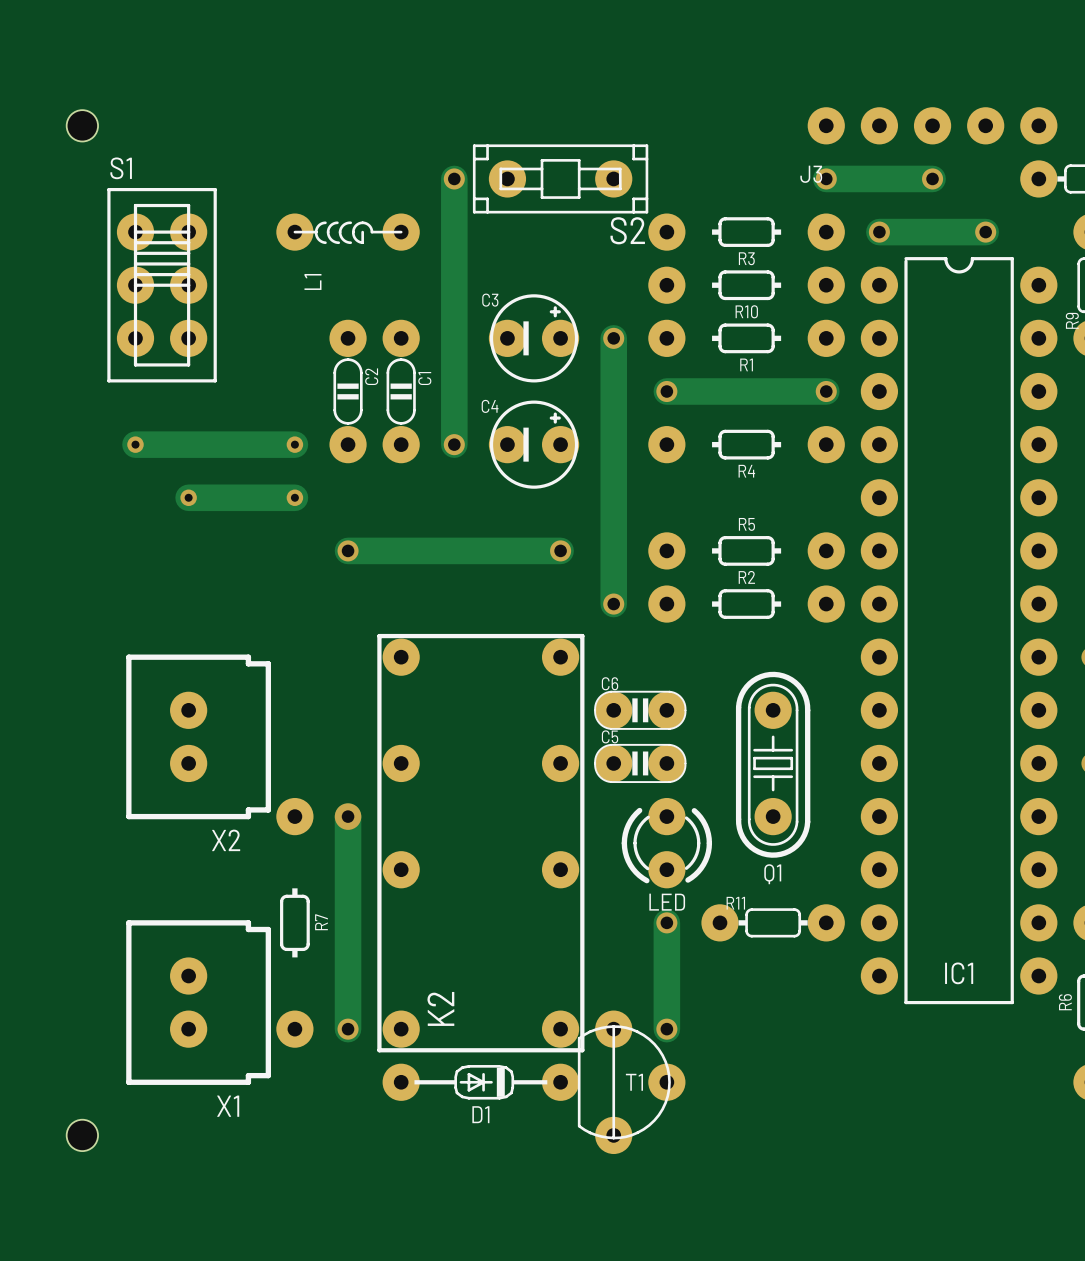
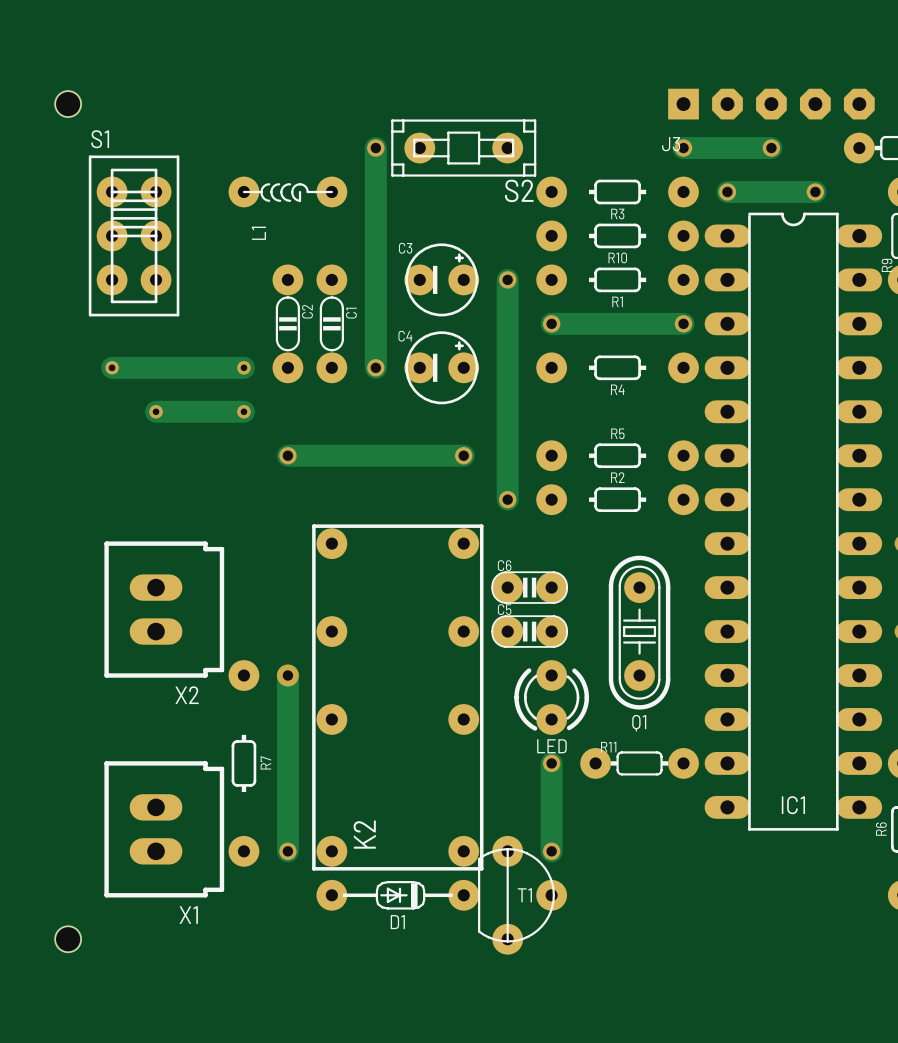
J3 footprint: [807, 107, 1058, 145] -> [668, 88, 875, 120]
IC1 footprint: [860, 257, 1058, 1005] -> [704, 212, 883, 831]
X2 footprint: [126, 654, 271, 820] -> [104, 541, 225, 678]
X1 footprint: [126, 920, 271, 1085] -> [104, 761, 225, 898]

